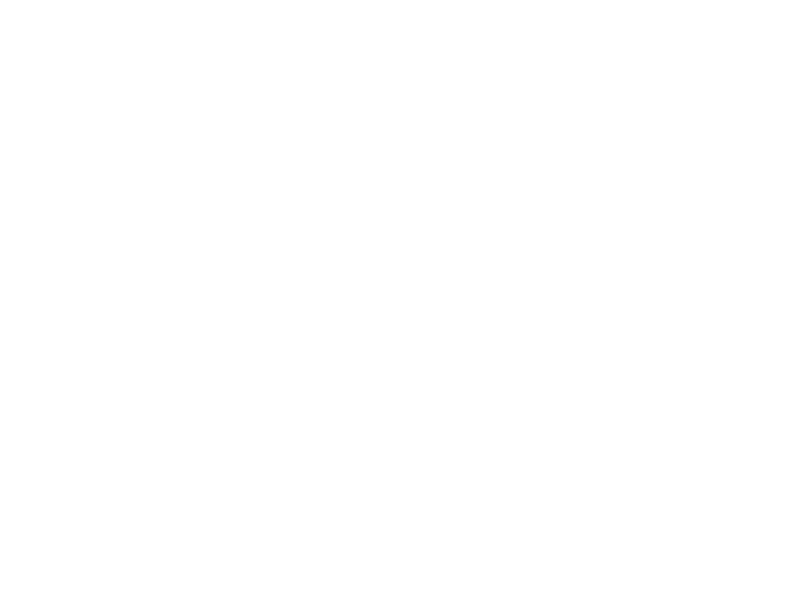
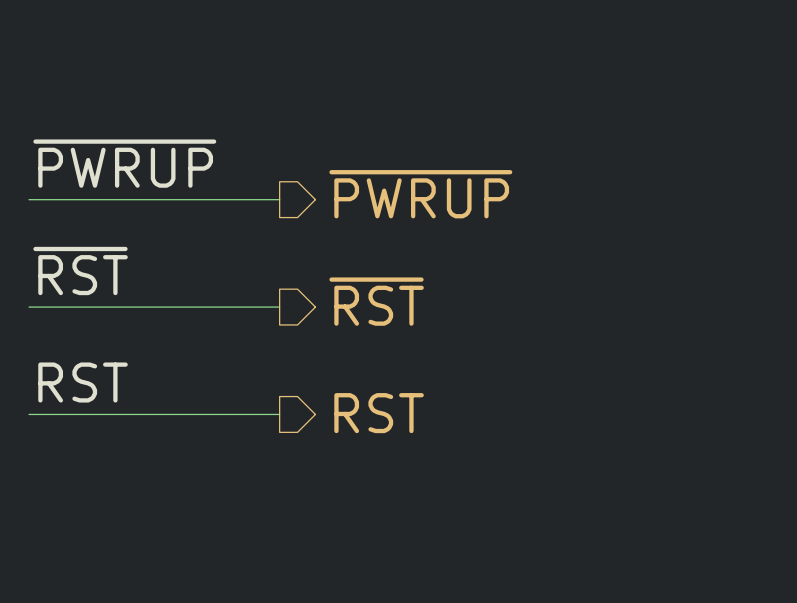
label: none -> ~{PWRUP} (124, 163)
hierarchical label: none -> ~{PWRUP} (420, 194)
wire: none -> (29, 199) (279, 199)
label: none -> ~{RST} (80, 271)
hierarchical label: none -> ~{RST} (376, 301)
wire: none -> (29, 307) (279, 307)
label: none -> RST (83, 382)
hierarchical label: none -> RST (379, 413)
wire: none -> (29, 414) (279, 414)

